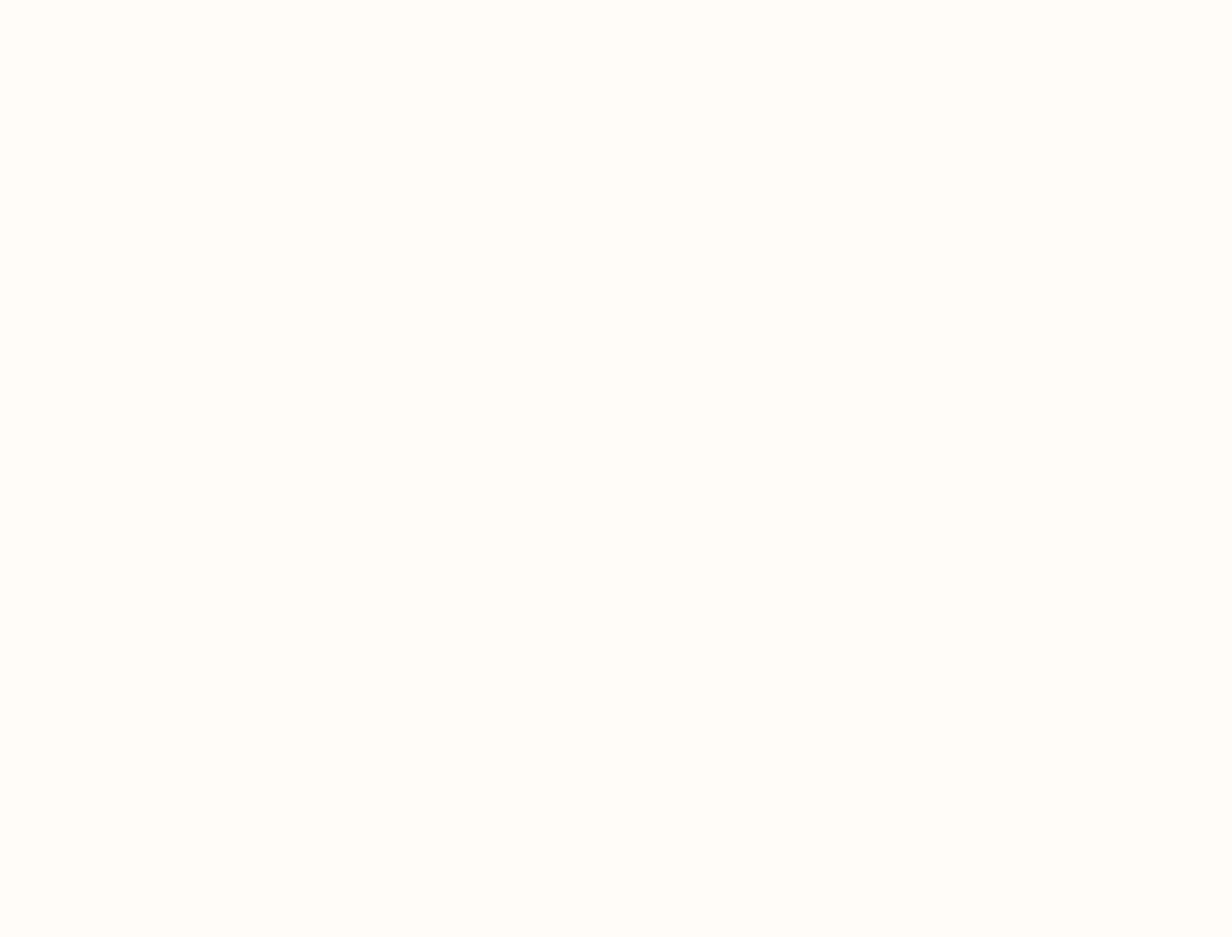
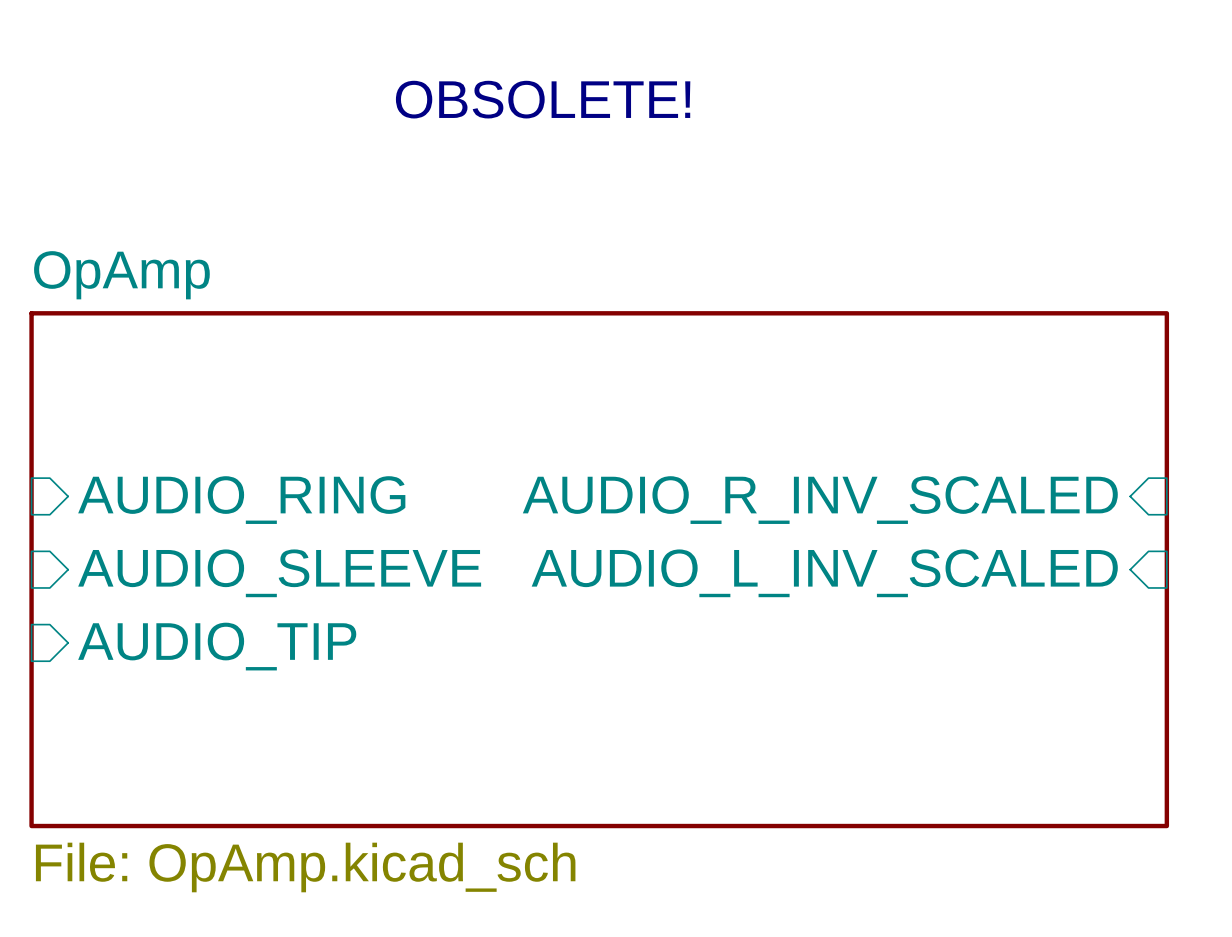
text: none -> OBSOLETE! (543, 99)
sheet pin: none -> AUDIO_RING (241, 500)
sheet pin: none -> AUDIO_R_INV_SCALED (820, 500)
sheet OpAmp: none -> File: OpAmp.kicad_sch (599, 569)
sheet pin: none -> AUDIO_SLEEVE (279, 573)
sheet pin: none -> AUDIO_L_INV_SCALED (824, 573)
sheet pin: none -> AUDIO_TIP (217, 646)

